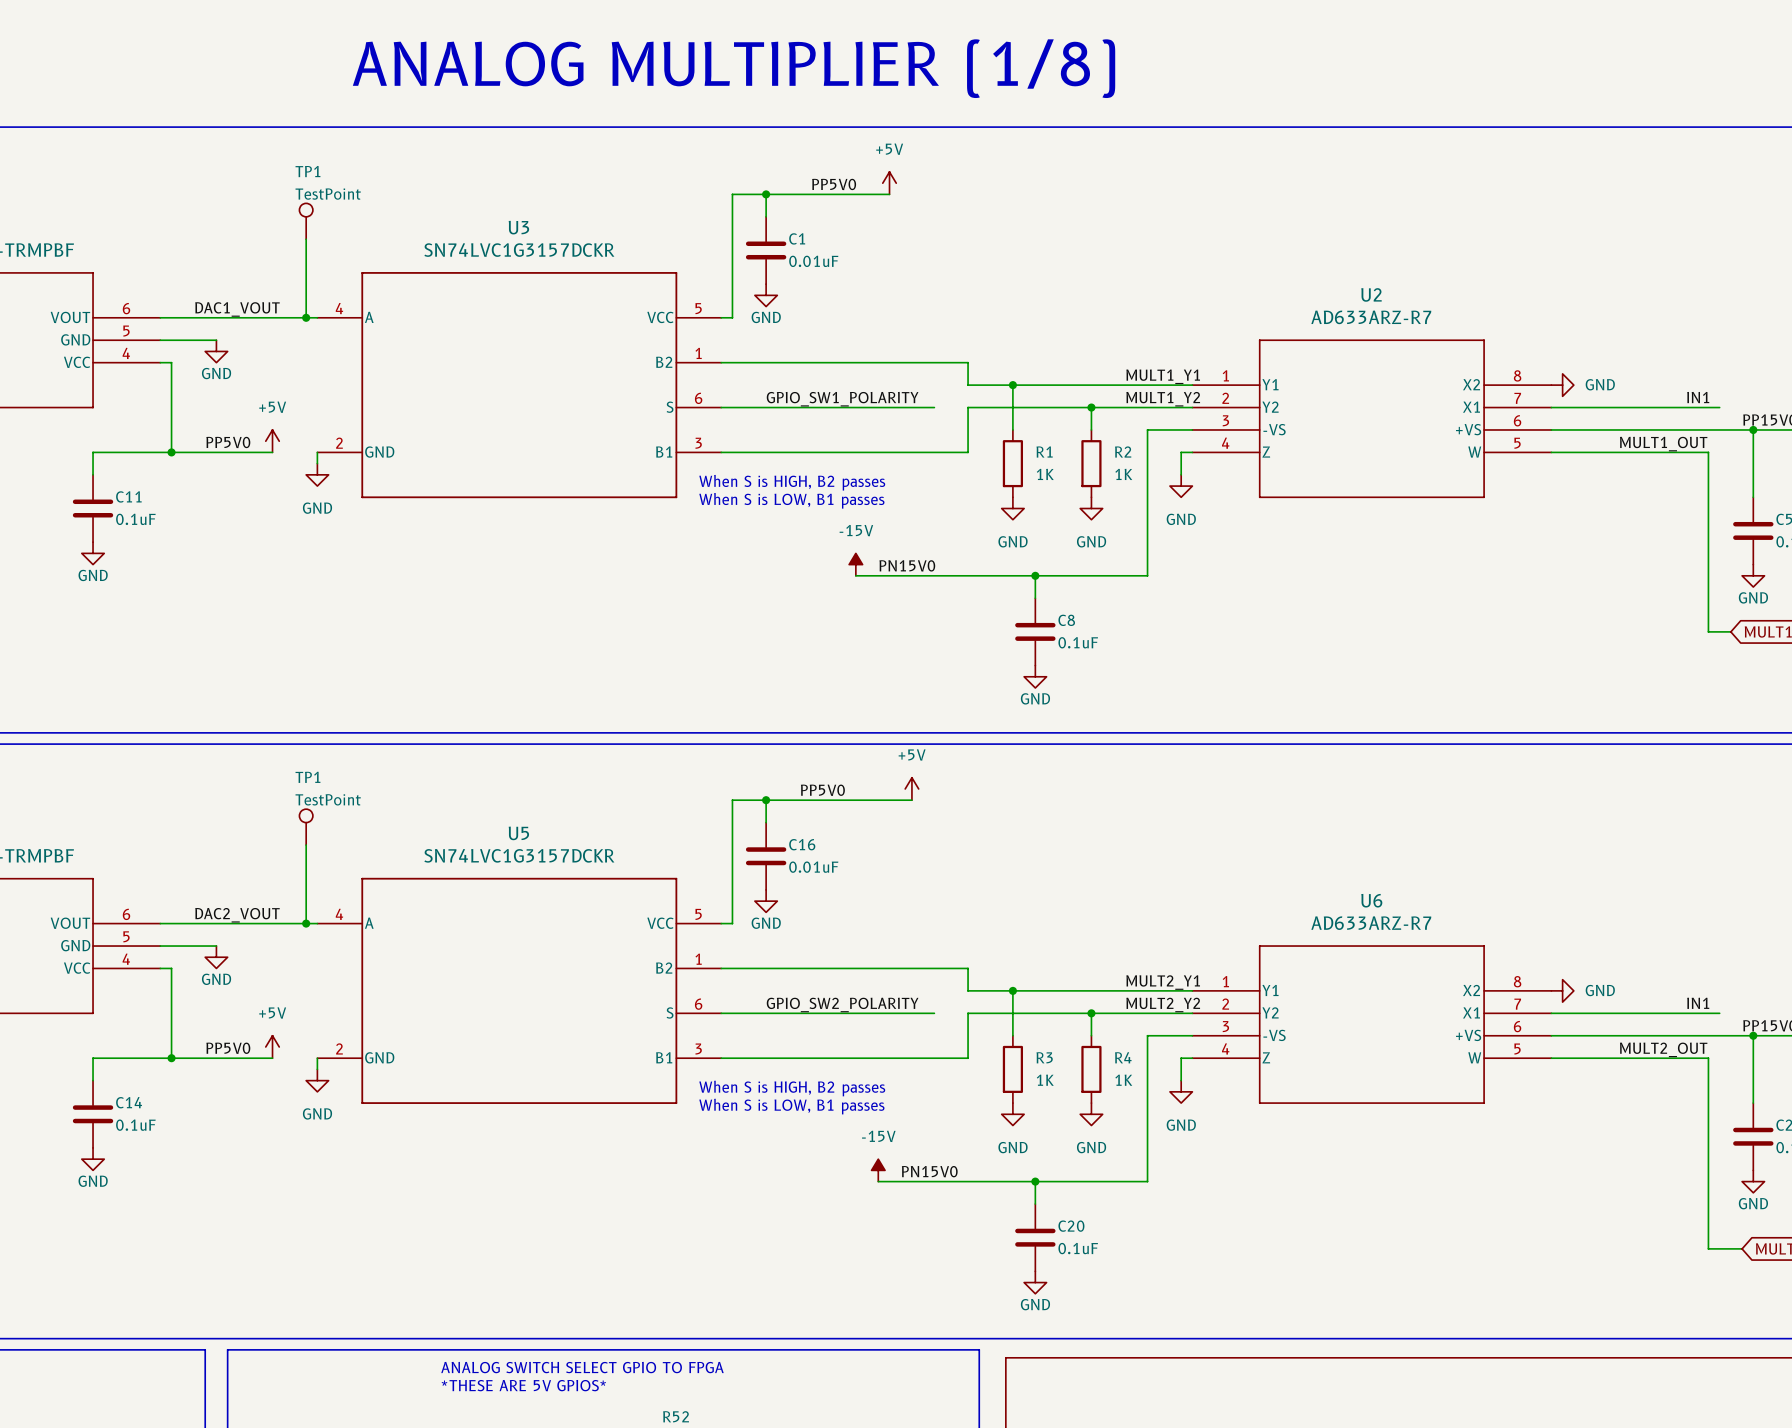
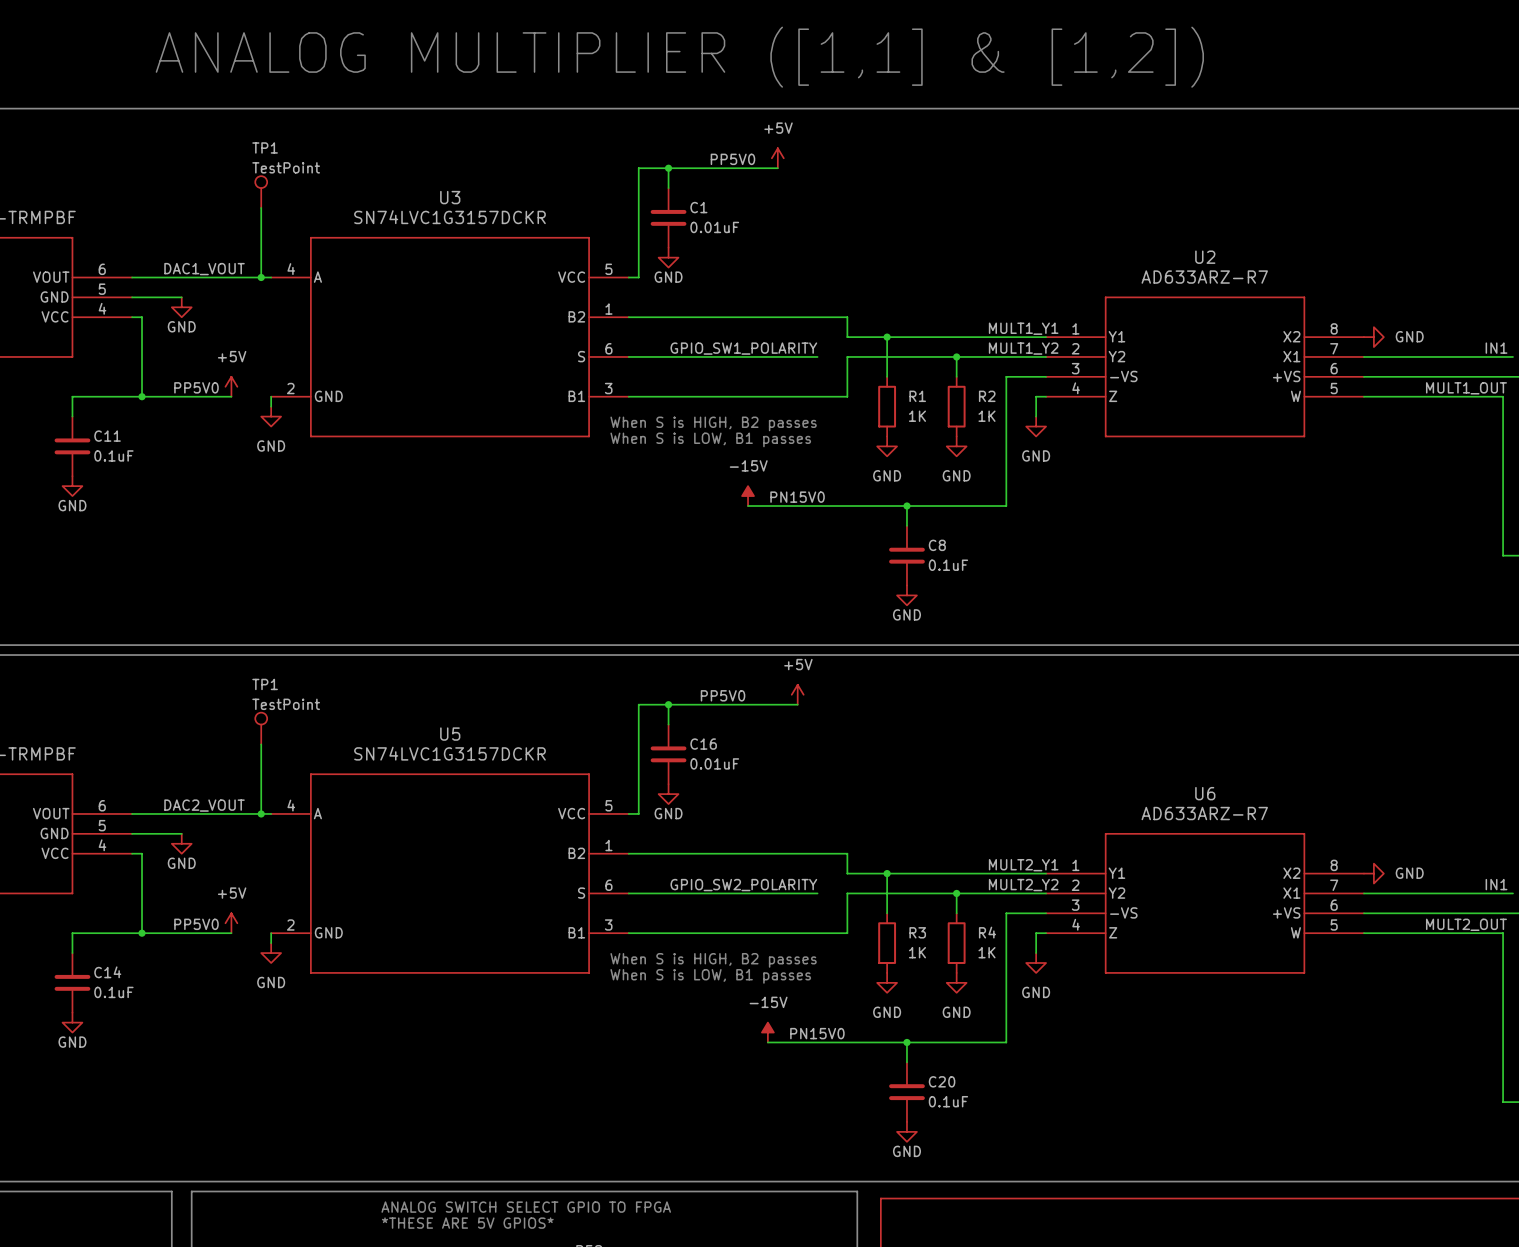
text: ANALOG MULTIPLIER (1/8) (734, 68) -> ANALOG MULTIPLIER ([1,1] & [1,2]) (679, 57)

